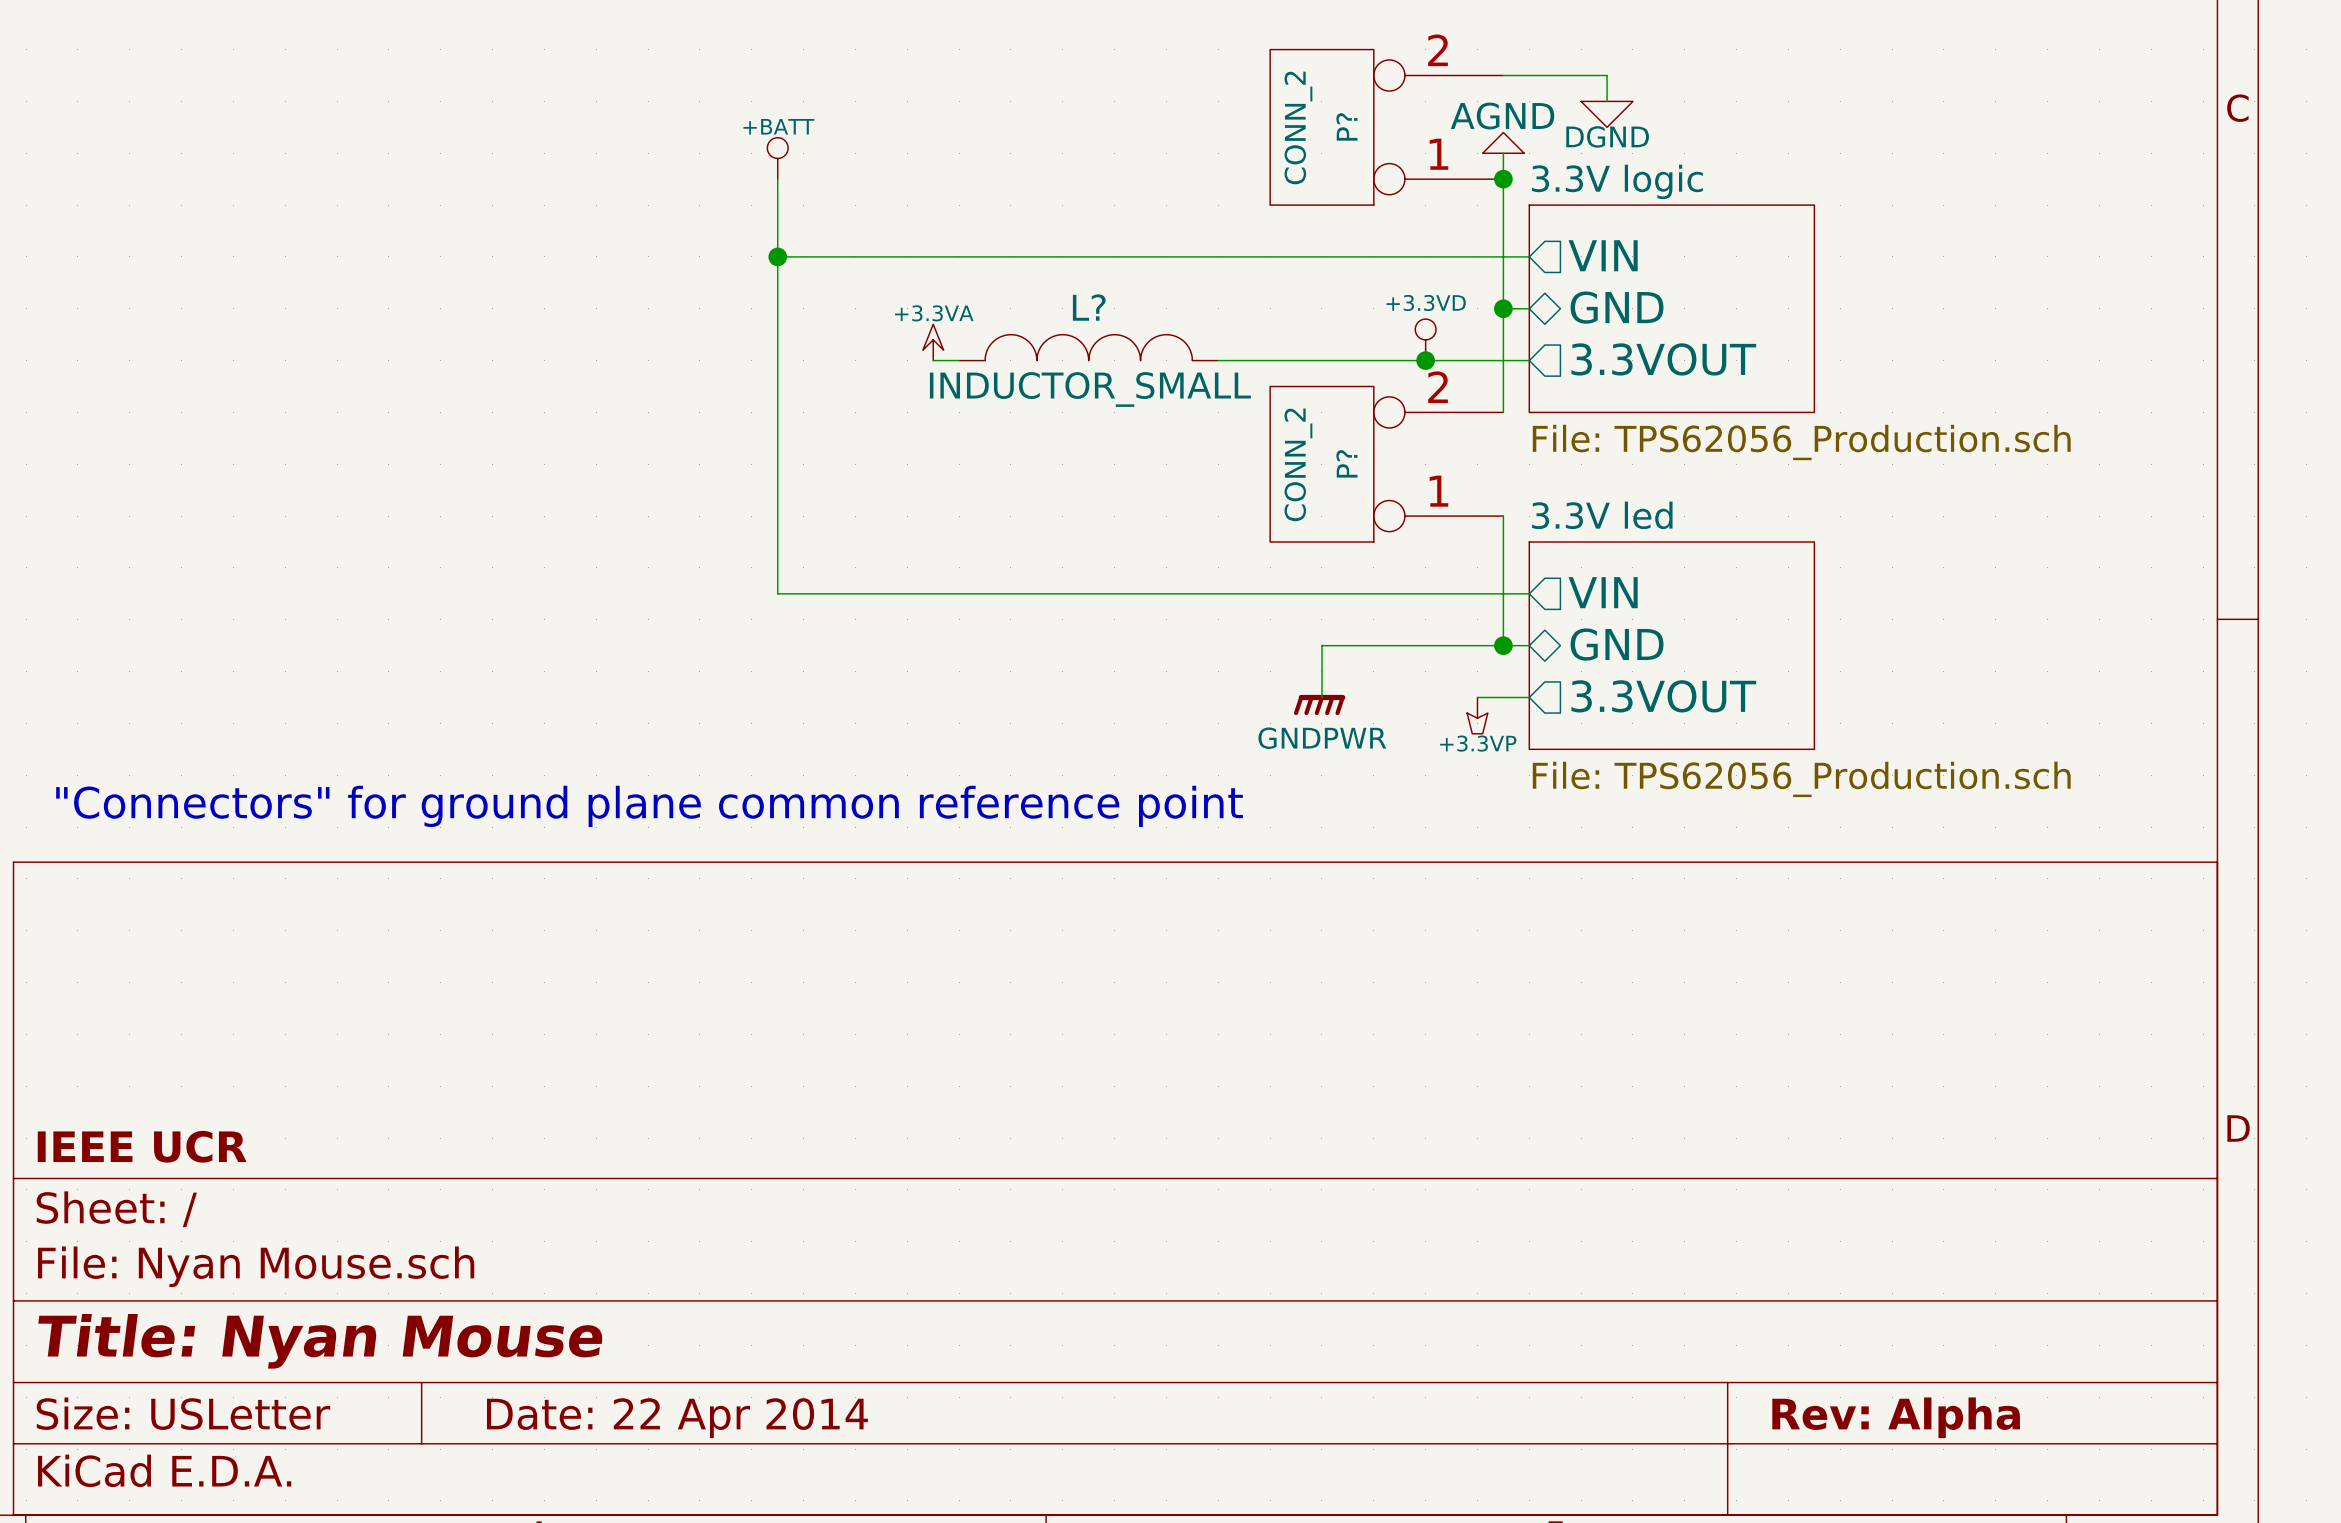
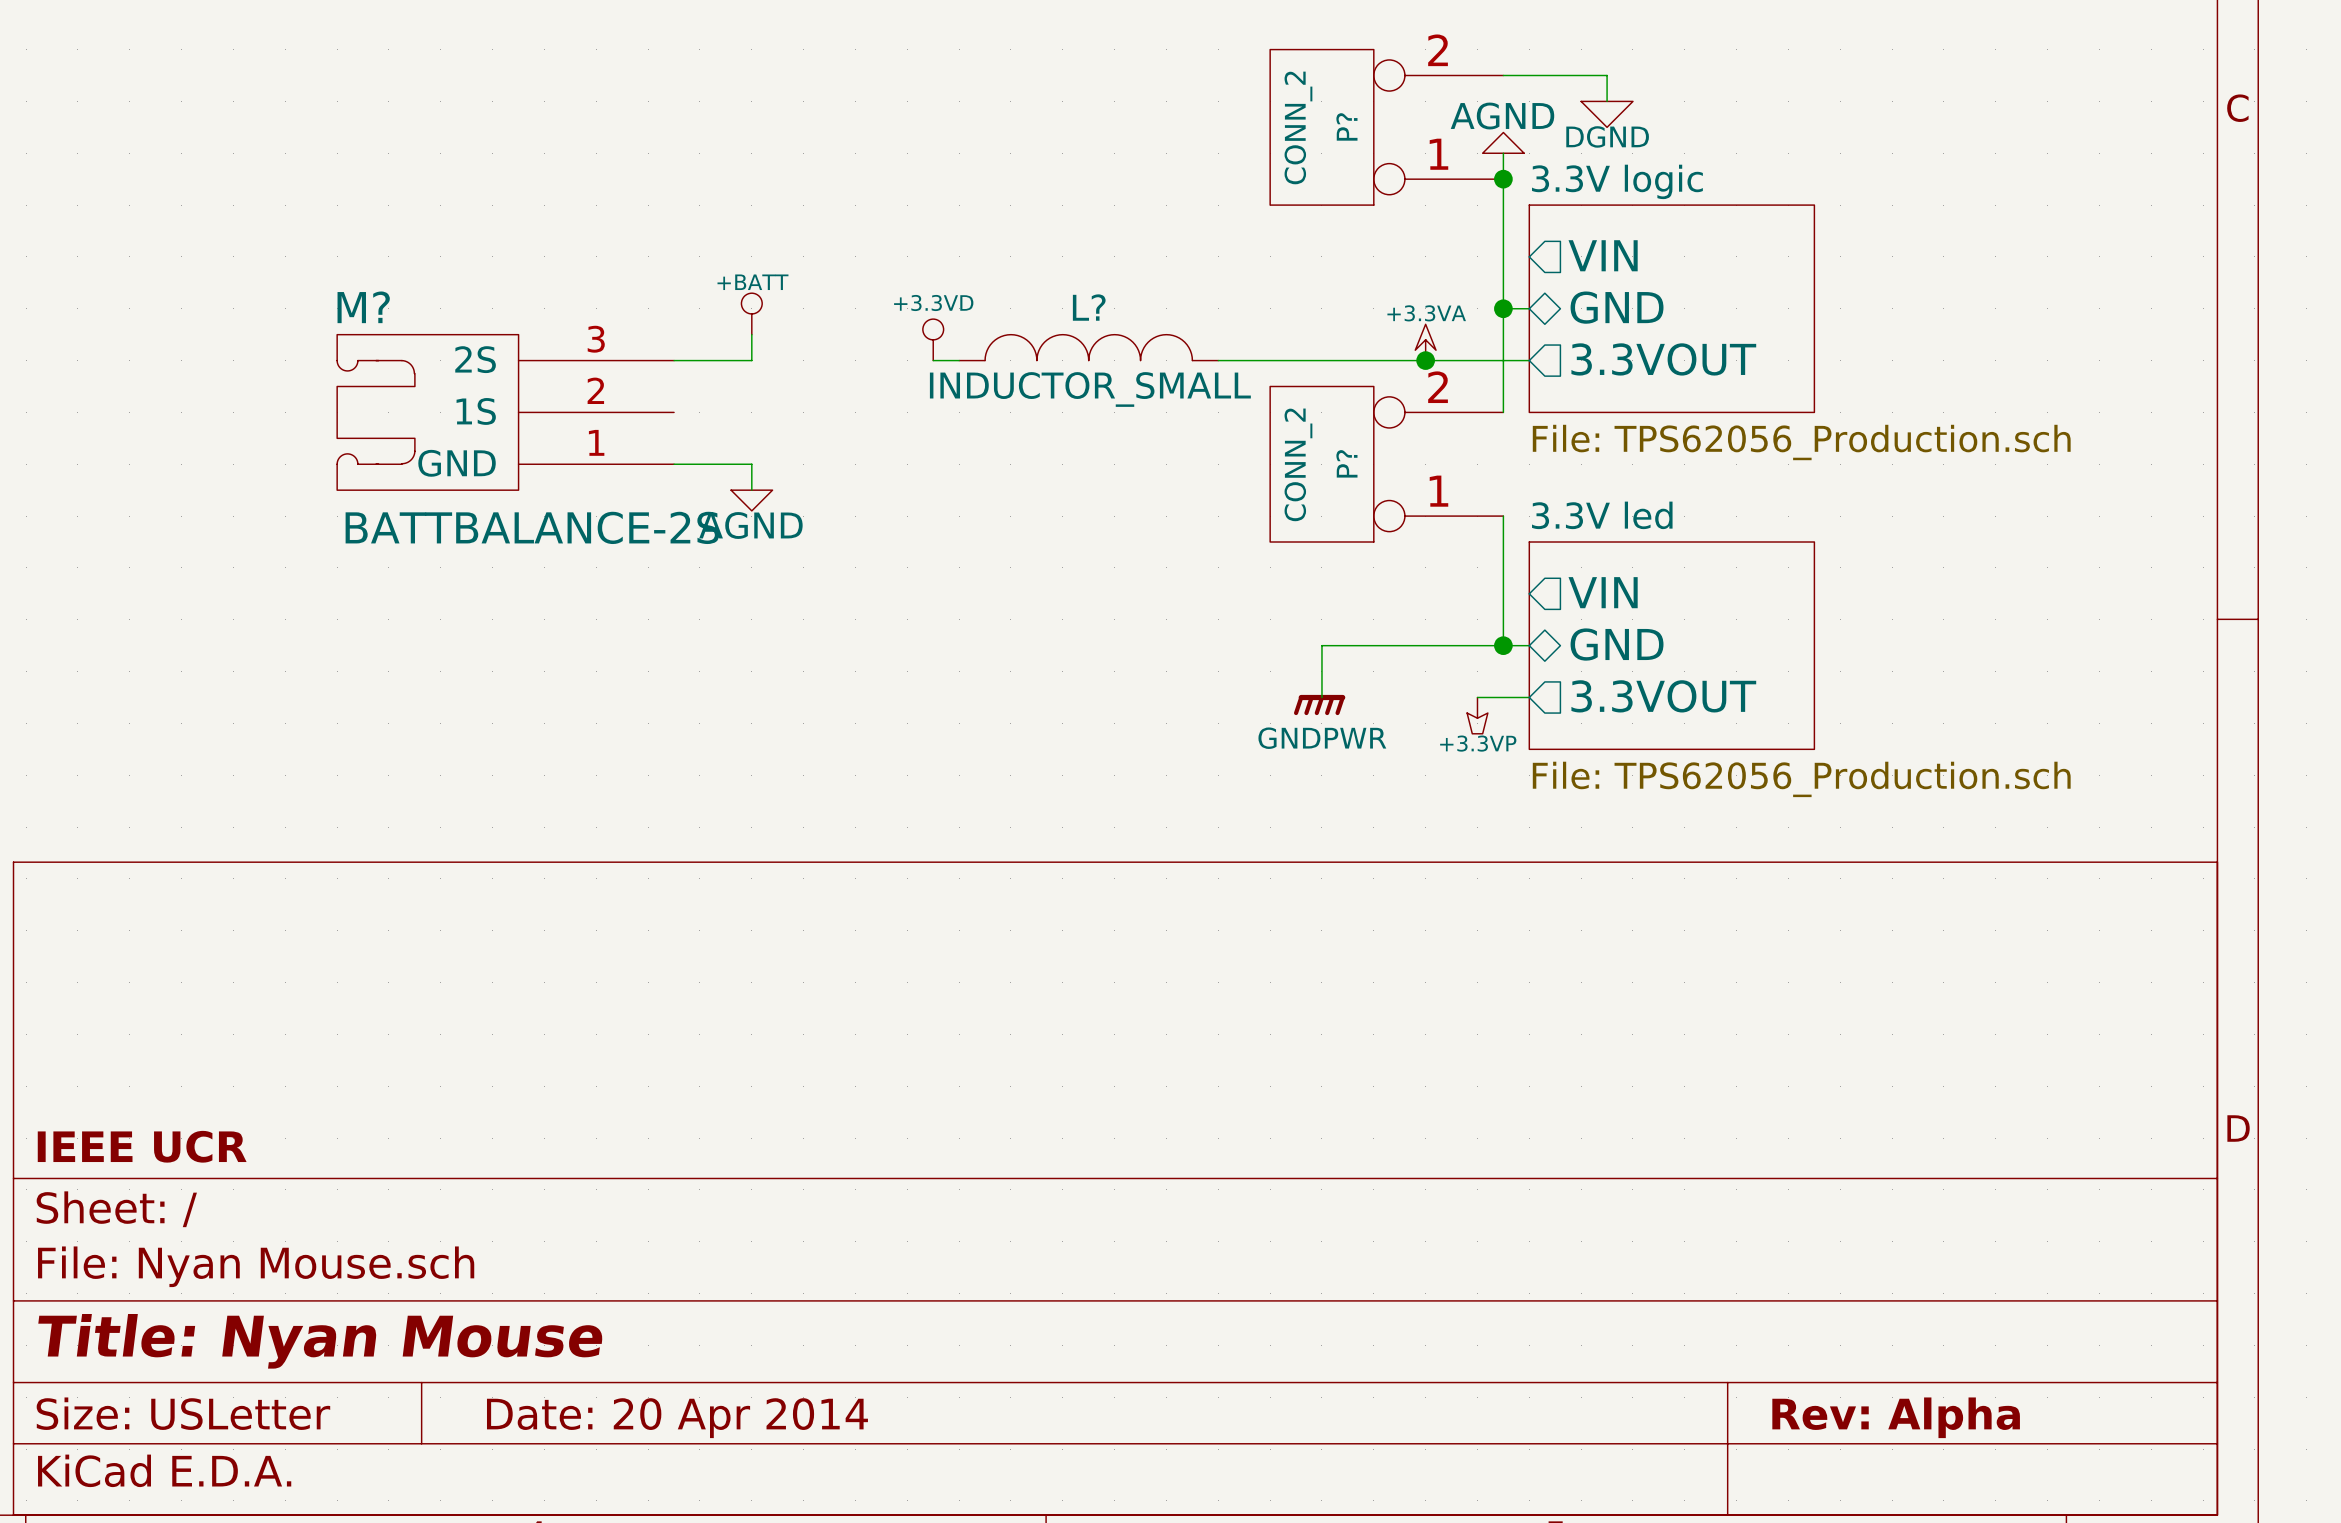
power symbol position: +BATT (777, 158) -> +BATT (751, 313)
wire: (777, 179) (777, 593) (1529, 593) -> none
wire: (777, 256) (1529, 256) -> none
junction: (777, 256) -> none
wire: none -> (751, 334) (751, 360) (674, 360)
power symbol: +3.3VD (1425, 339) -> +3.3VA (1425, 342)
power symbol: +3.3VA (933, 342) -> +3.3VD (933, 339)
M?: none -> BATTBALANCE-2S (505, 412)
wire: none -> (674, 464) (751, 464) (751, 490)
power symbol: none -> AGND (751, 500)
text: "Connectors" for ground plane common reference point (649, 806) -> none
title block: Date: 22 Apr 2014 (677, 1418) -> Date: 20 Apr 2014 (677, 1418)

